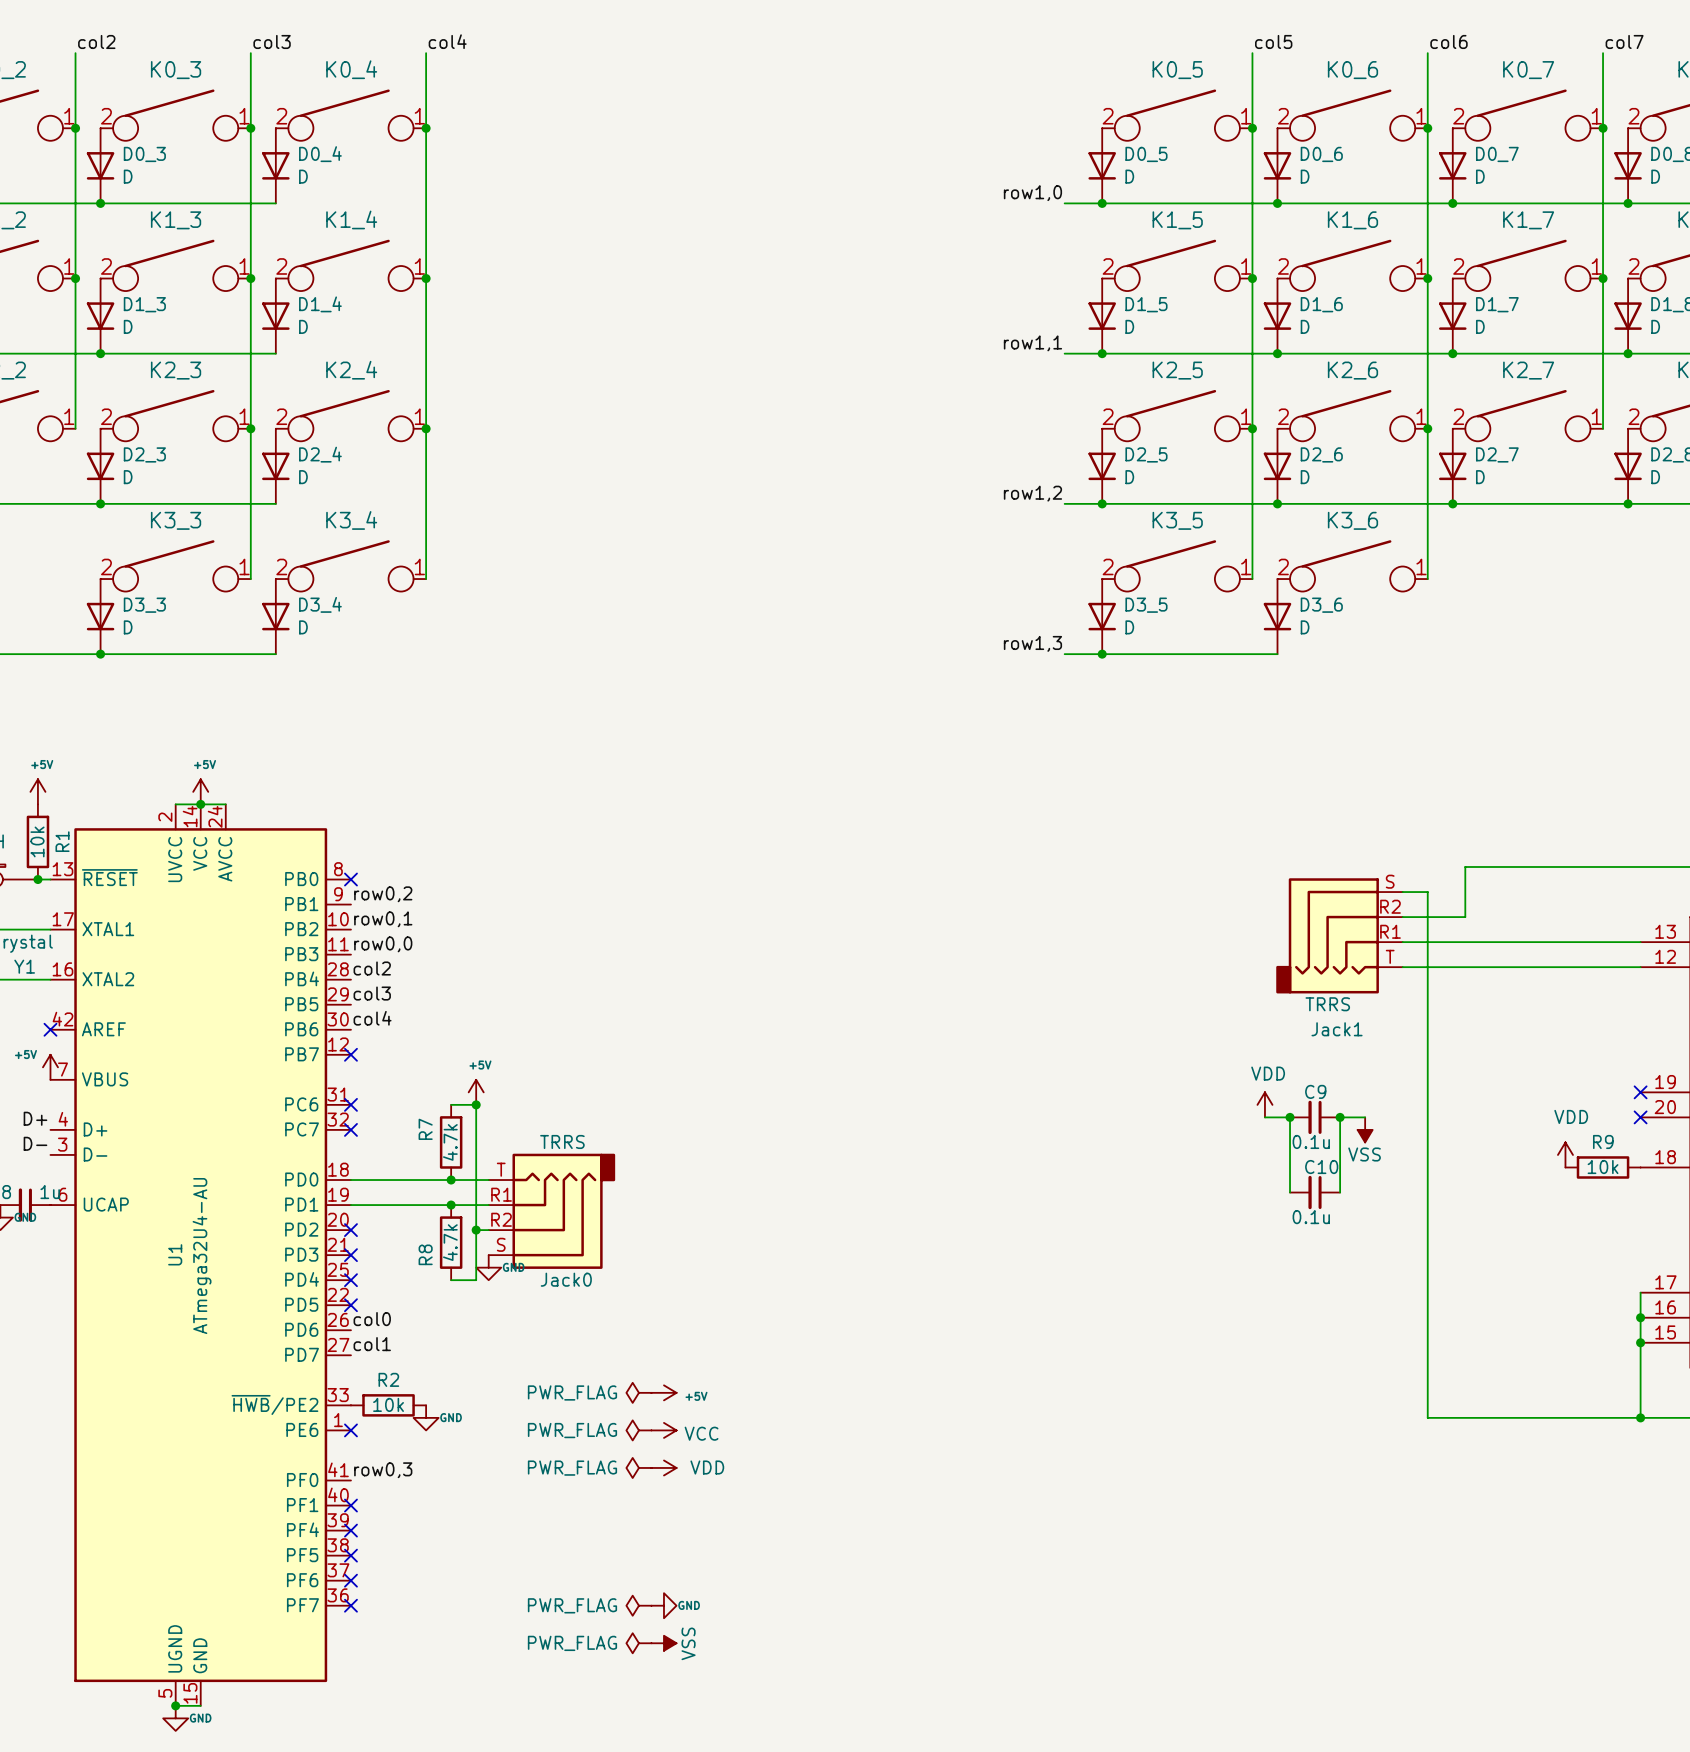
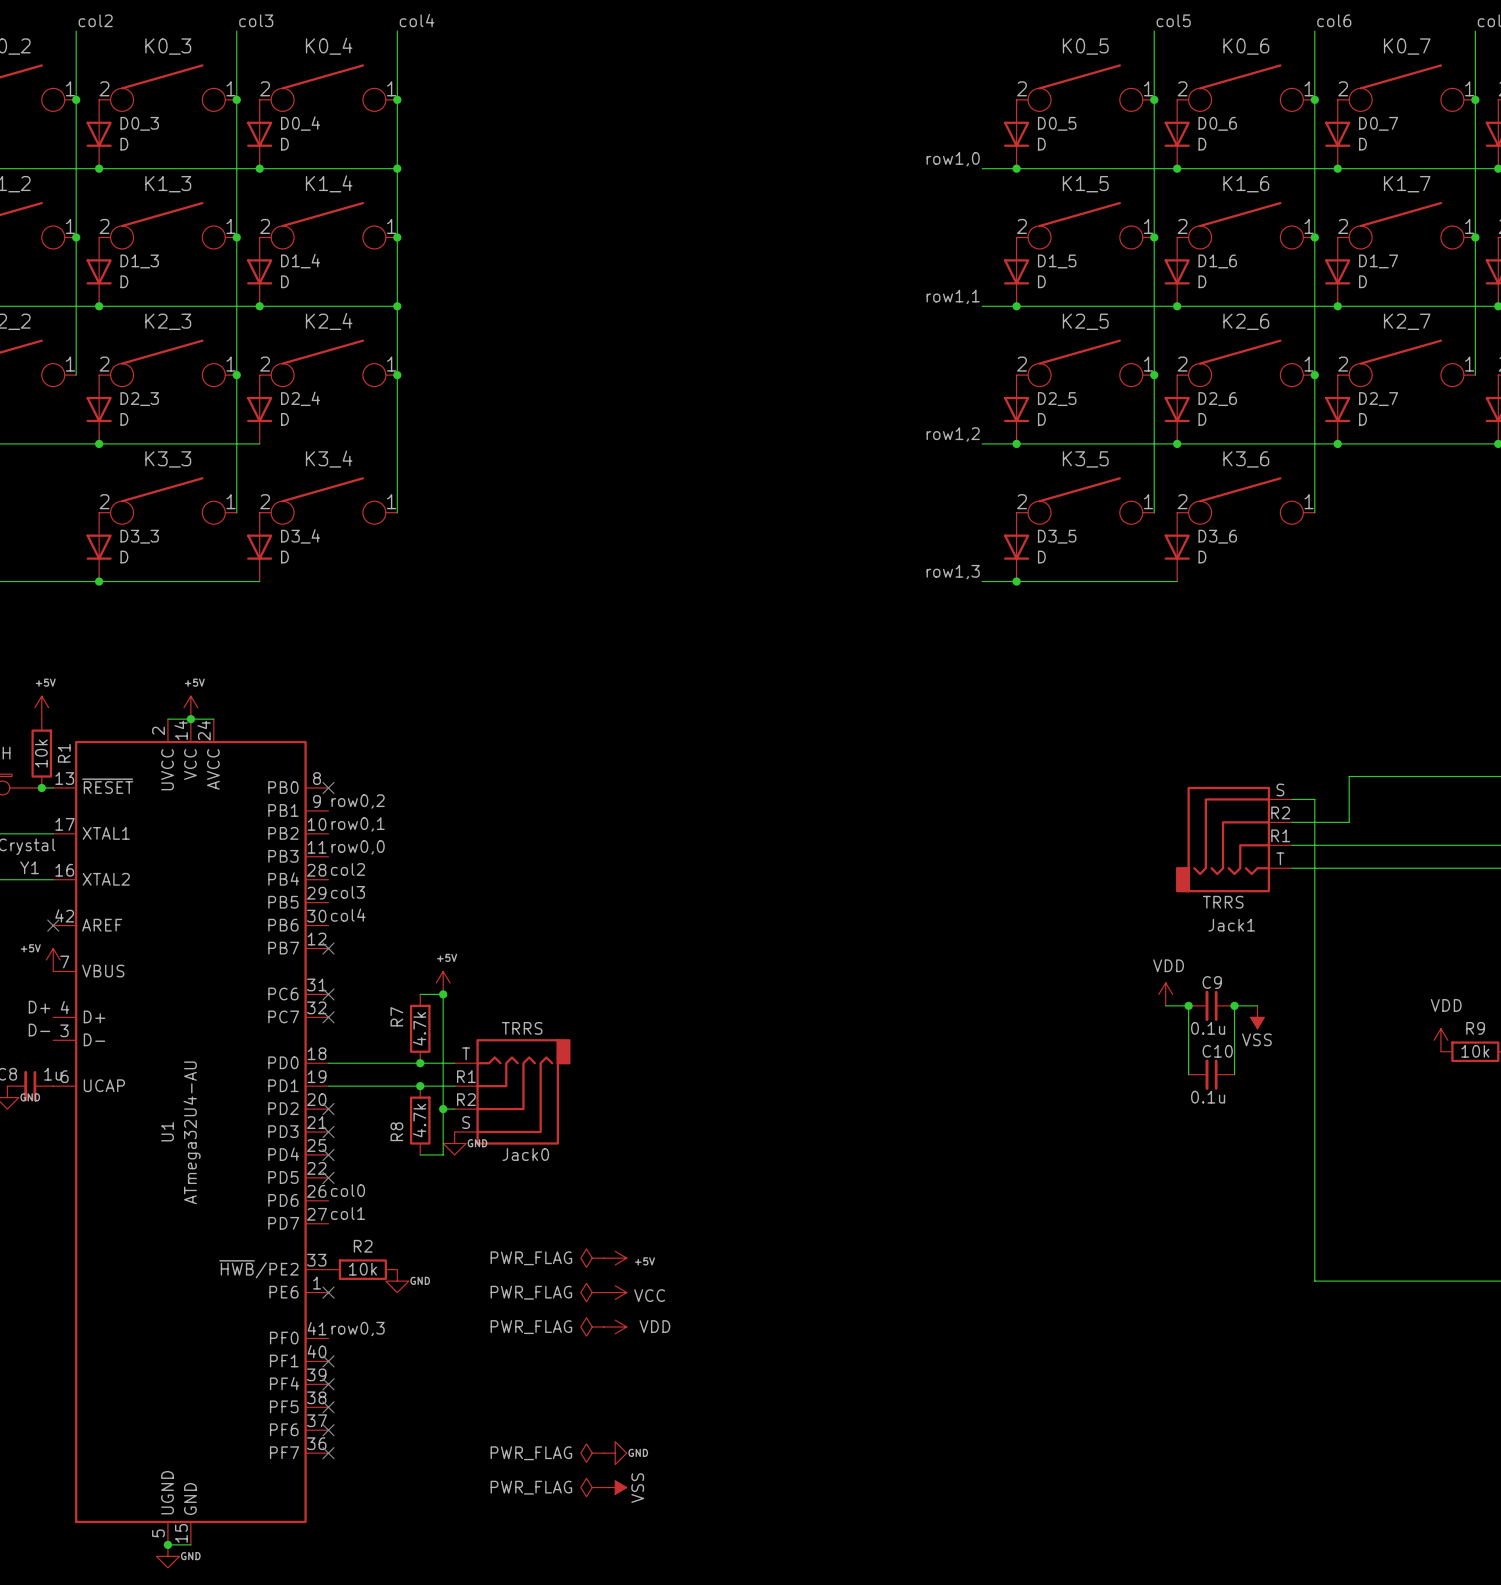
wire: none -> (259, 168) (397, 168)
junction: none -> (259, 168)
junction: none -> (397, 168)
wire: none -> (259, 306) (397, 306)
junction: none -> (259, 306)
junction: none -> (397, 306)

